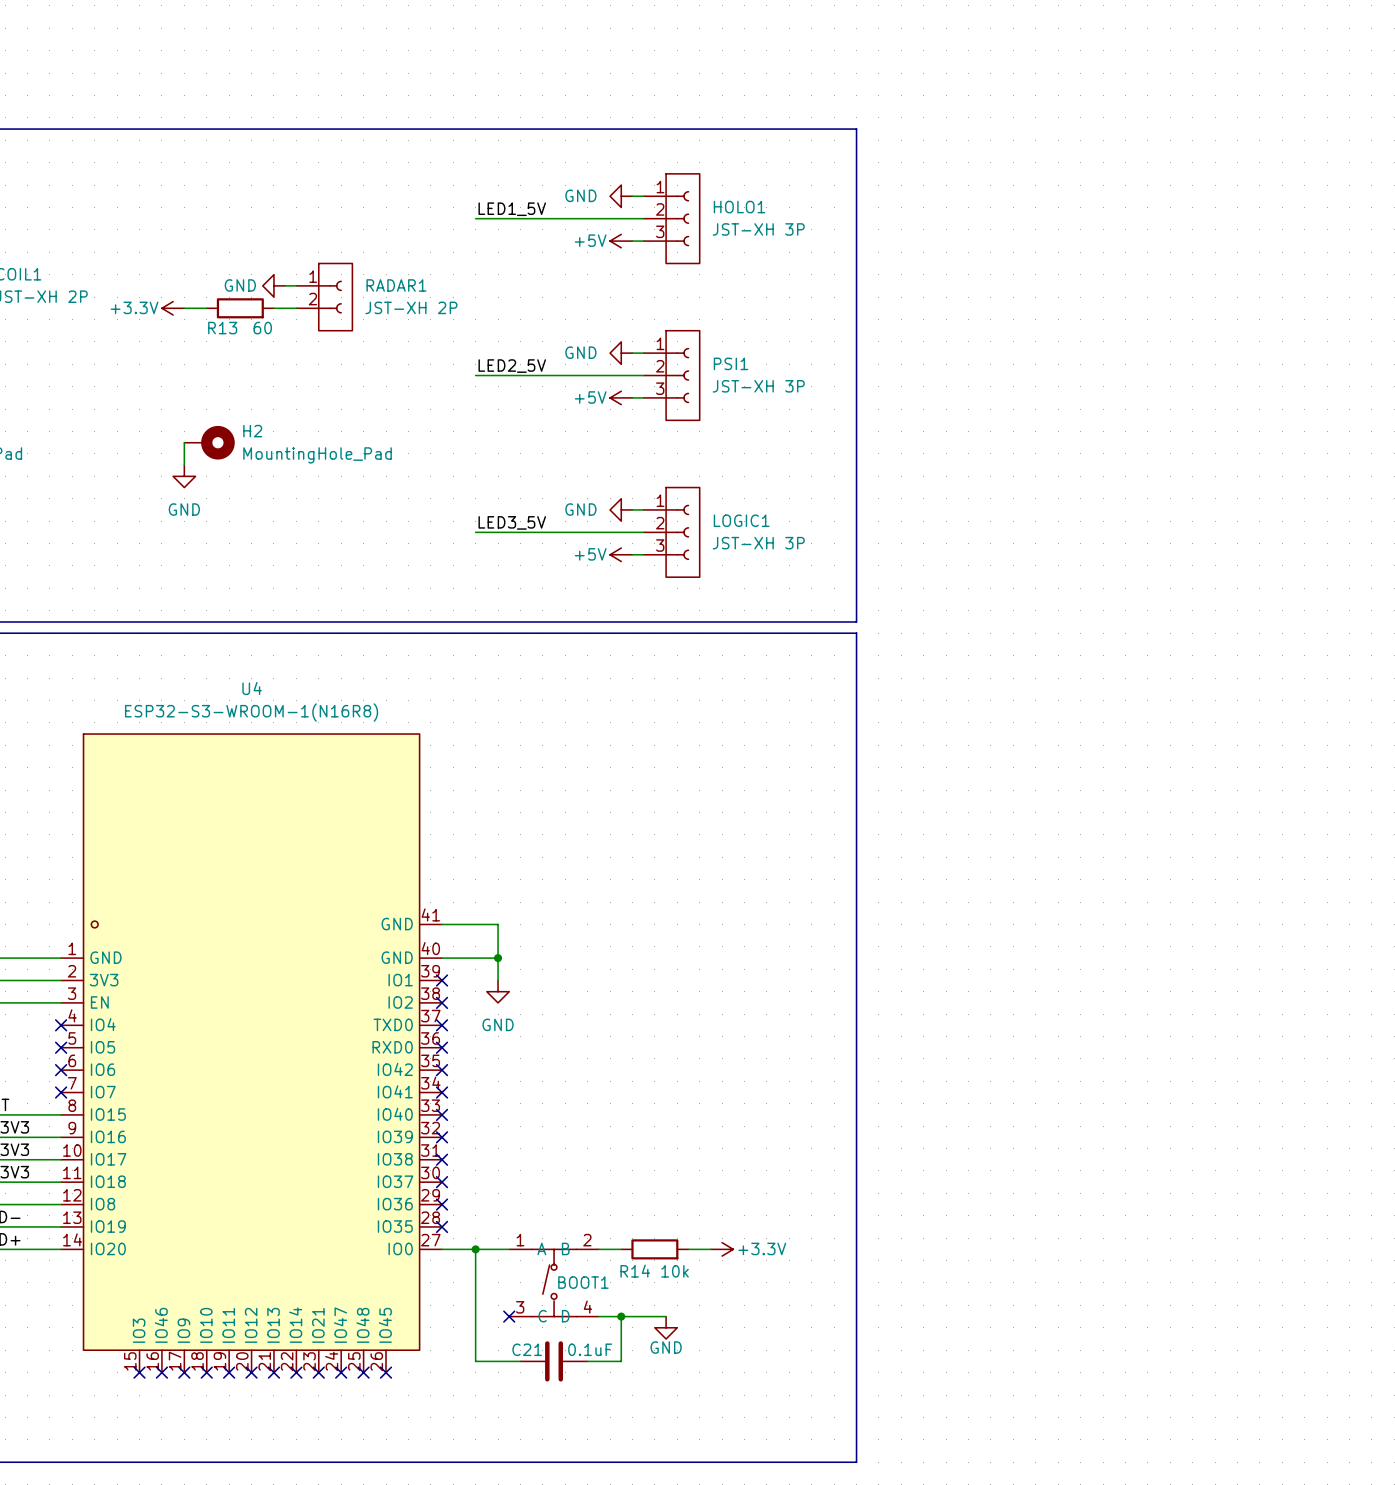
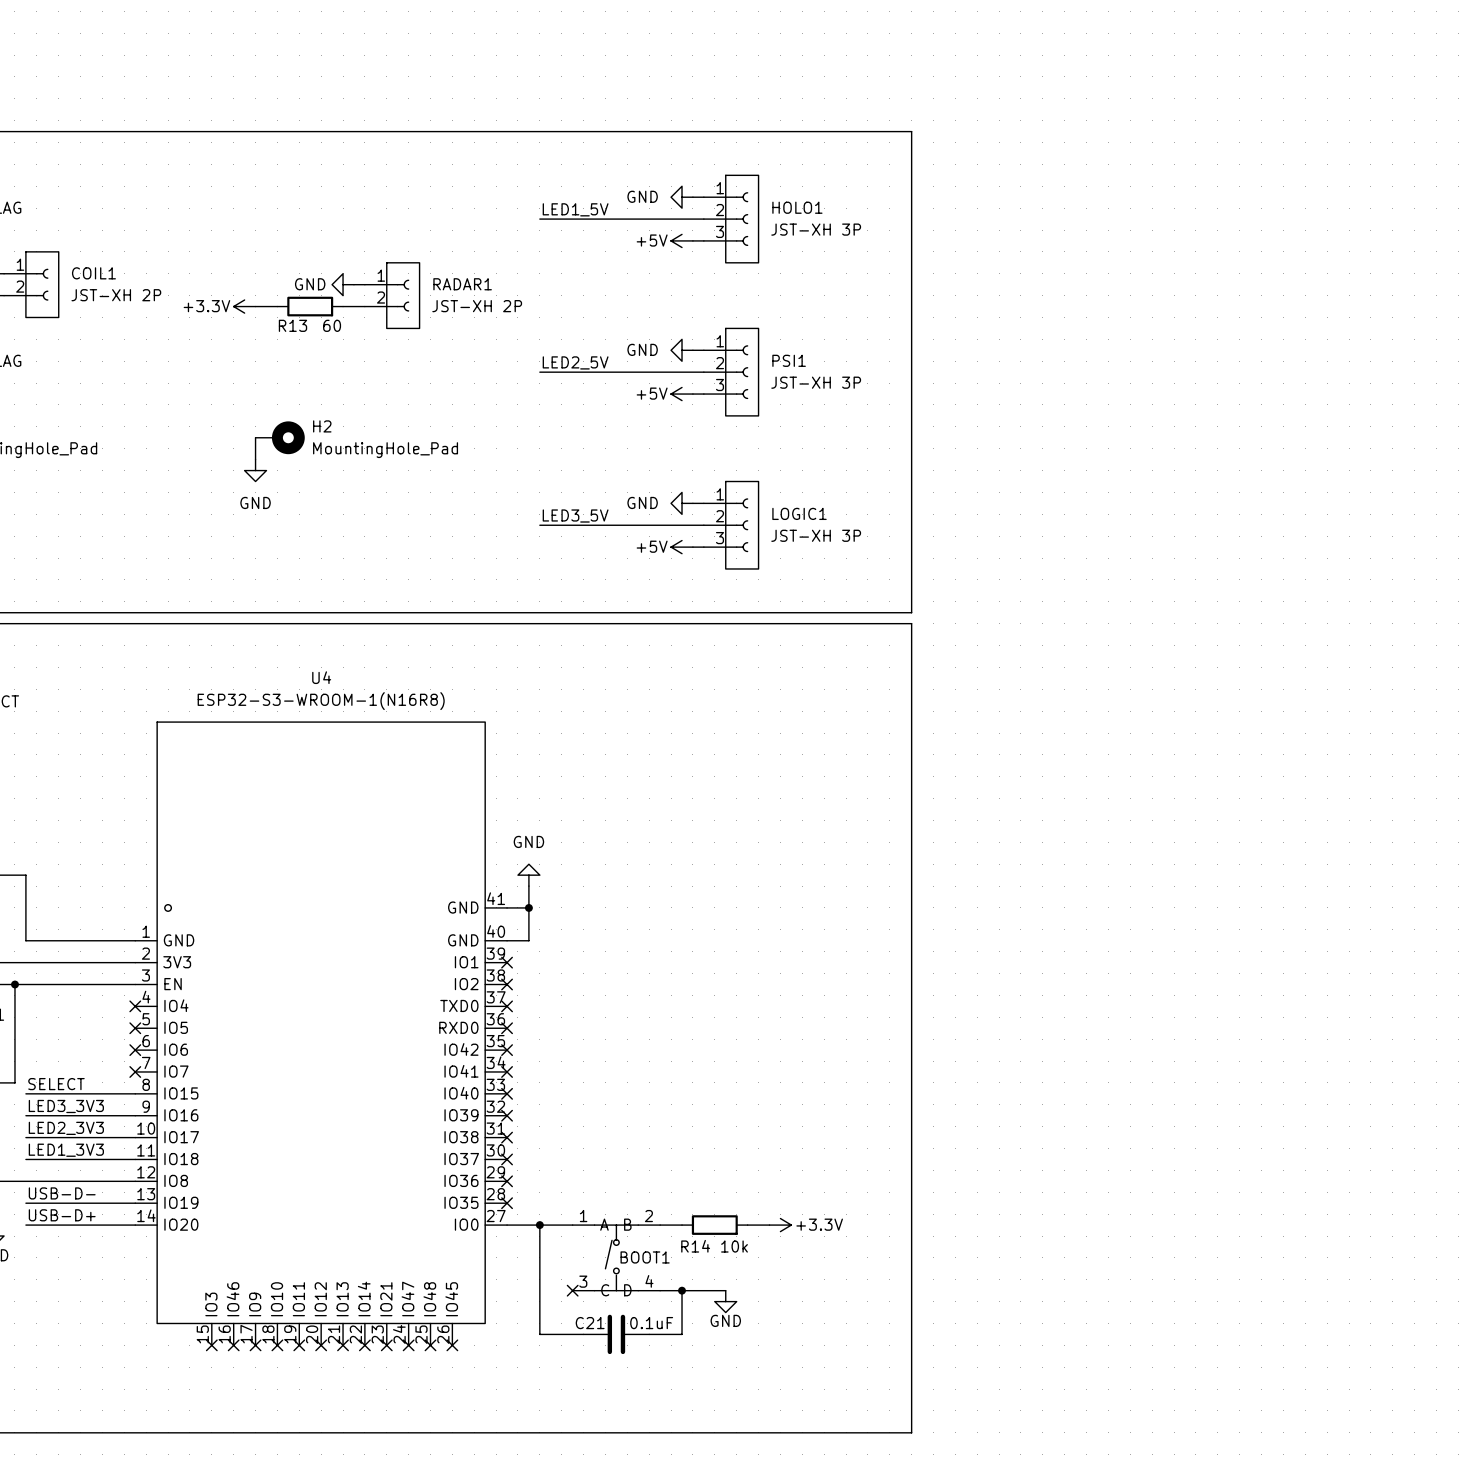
wire: (464, 924) (498, 924) (498, 980) -> none
wire: (464, 958) (498, 958) -> (528, 940) (528, 886)
junction position: (498, 958) -> (528, 907)
power symbol rotation: 0° (498, 991) -> 180° (528, 875)
power symbol position: GND (498, 991) -> GND (528, 875)

